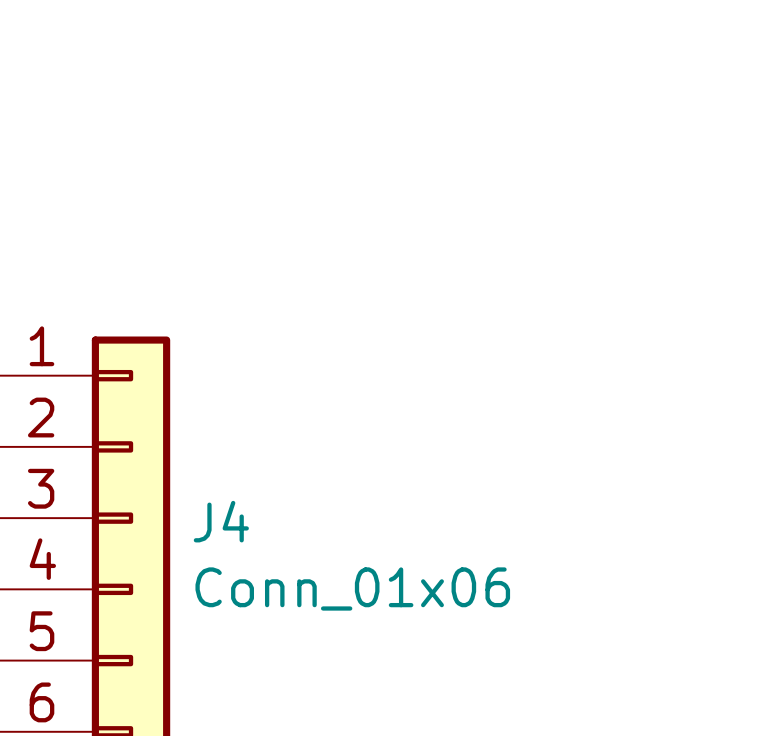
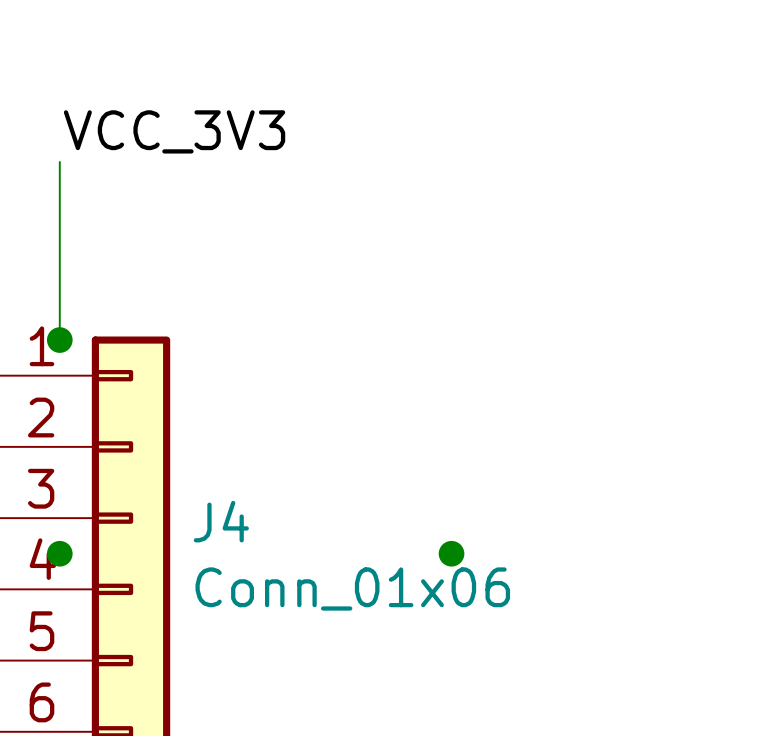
label: none -> VCC_3V3 (174, 131)
wire: none -> (59, 161) (59, 340)
junction: none -> (59, 340)
junction: none -> (59, 553)
junction: none -> (451, 553)

